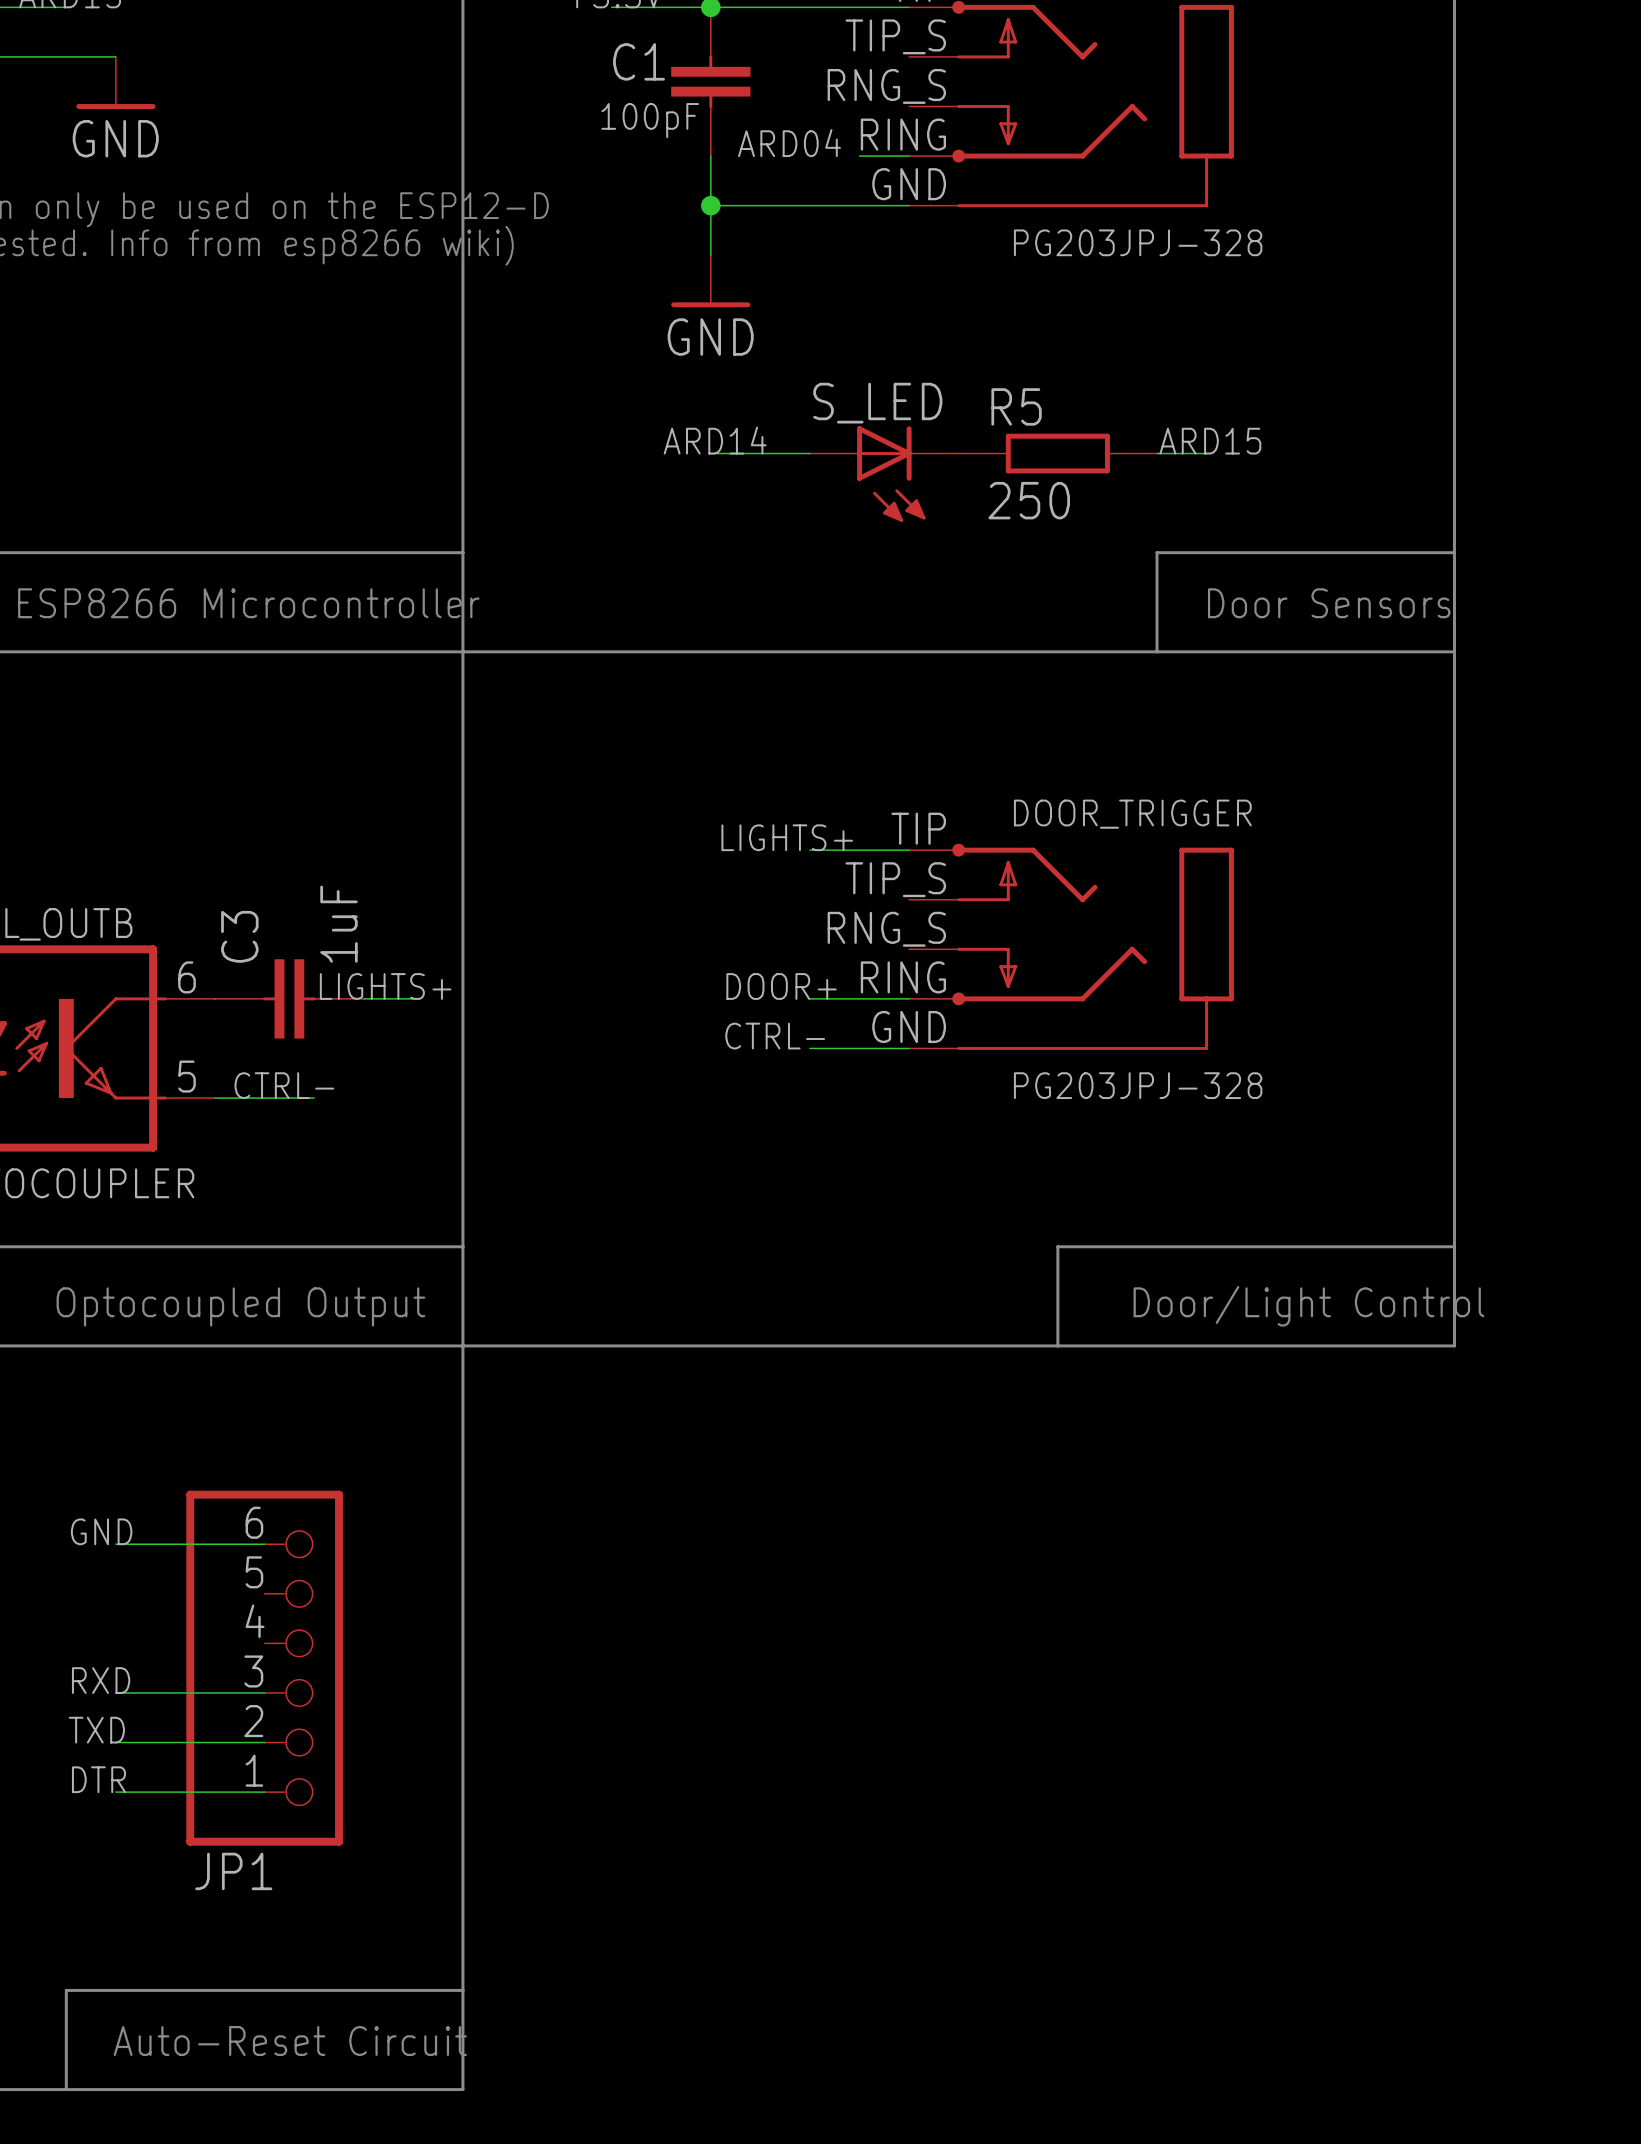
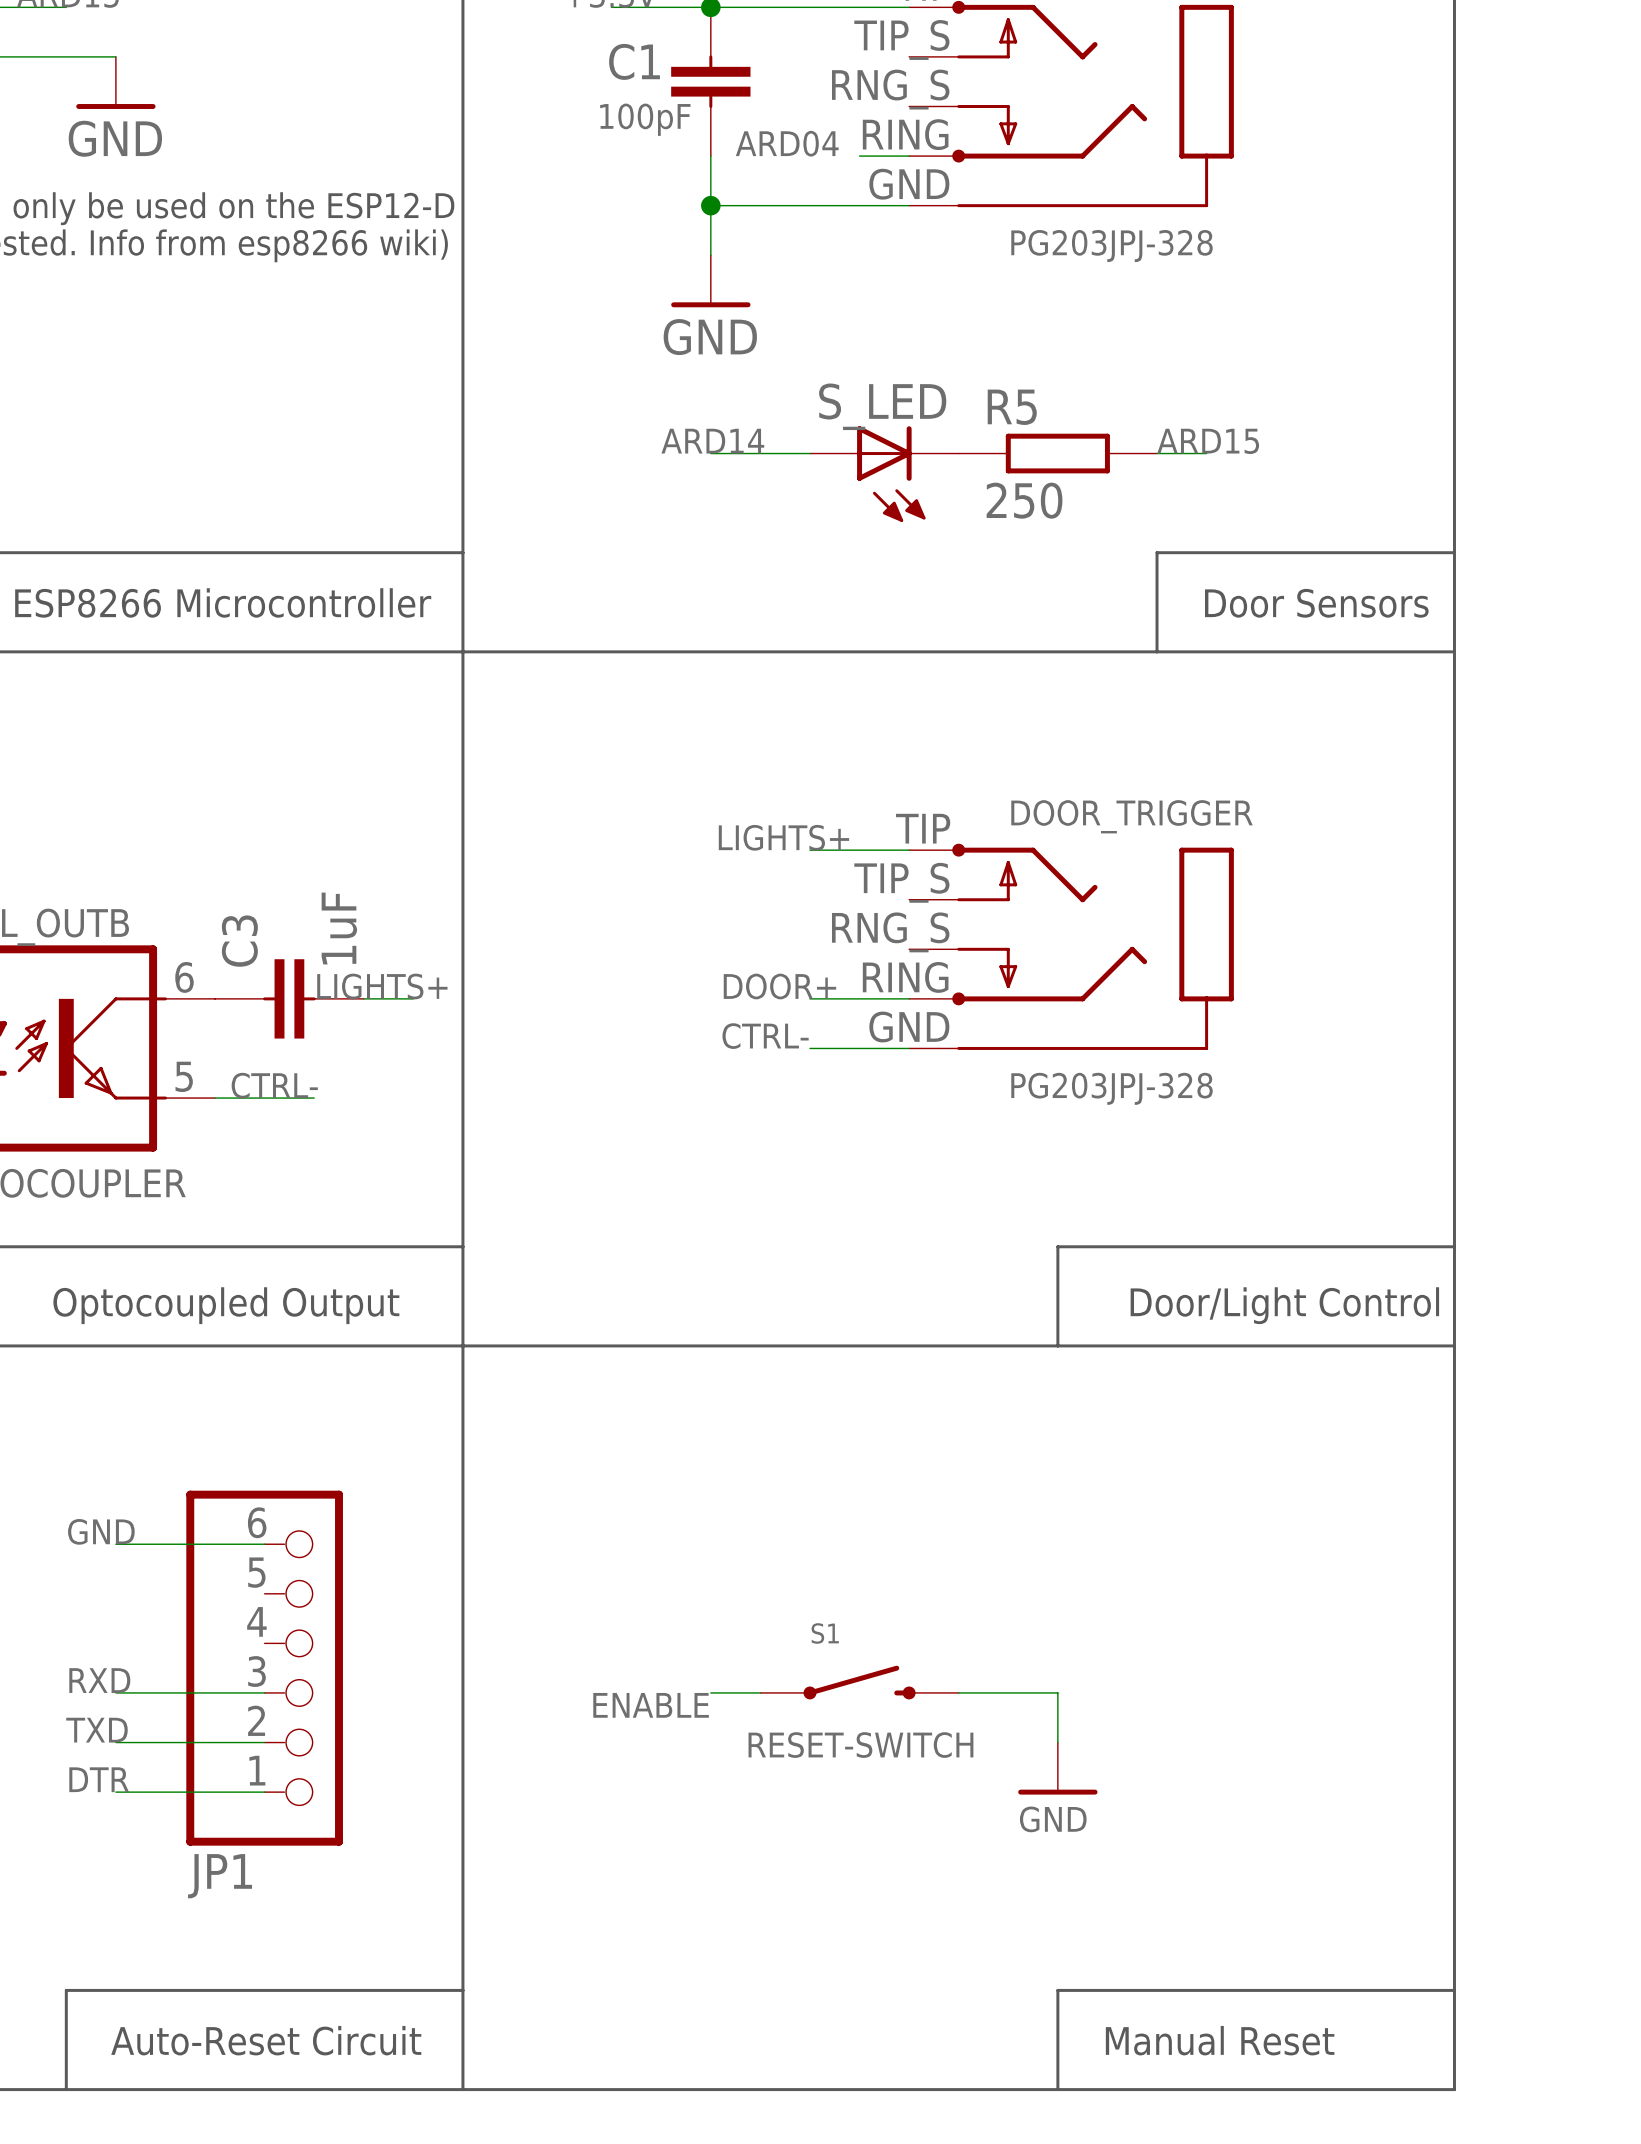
line: none -> (1454, 1345) (1454, 2089) (462, 2089)
S1: none -> RESET-SWITCH (859, 1682)
wire: none -> (710, 1692) (760, 1692)
wire: none -> (958, 1692) (1057, 1692) (1057, 1742)
label: none -> ENABLE (651, 1705)
power symbol: none -> GND (1057, 1768)
line: none -> (1454, 1990) (1057, 1990) (1057, 2089)
text: none -> Manual Reset (1220, 2040)

